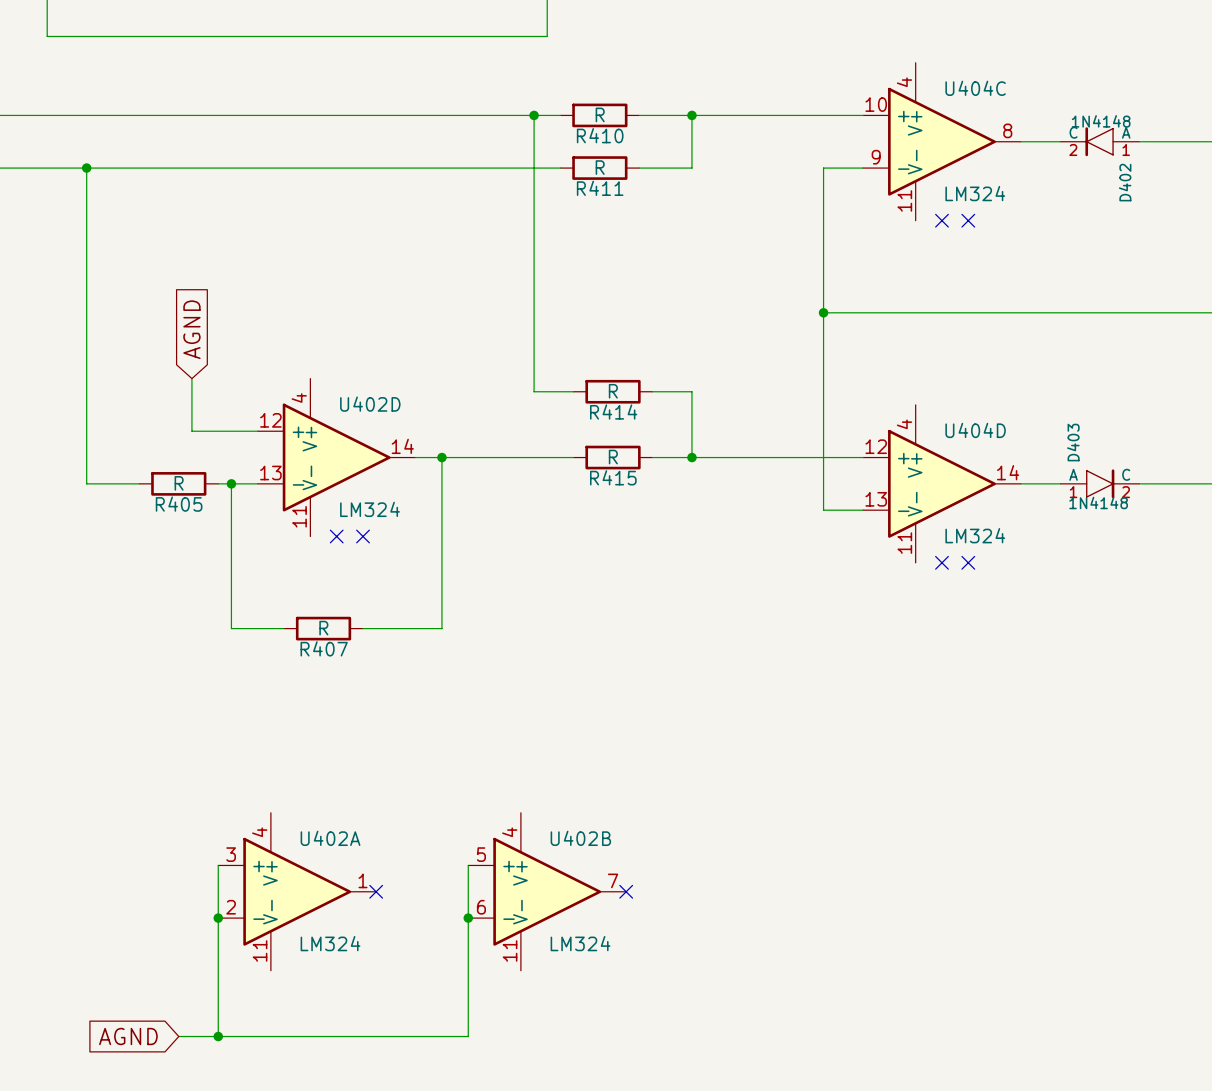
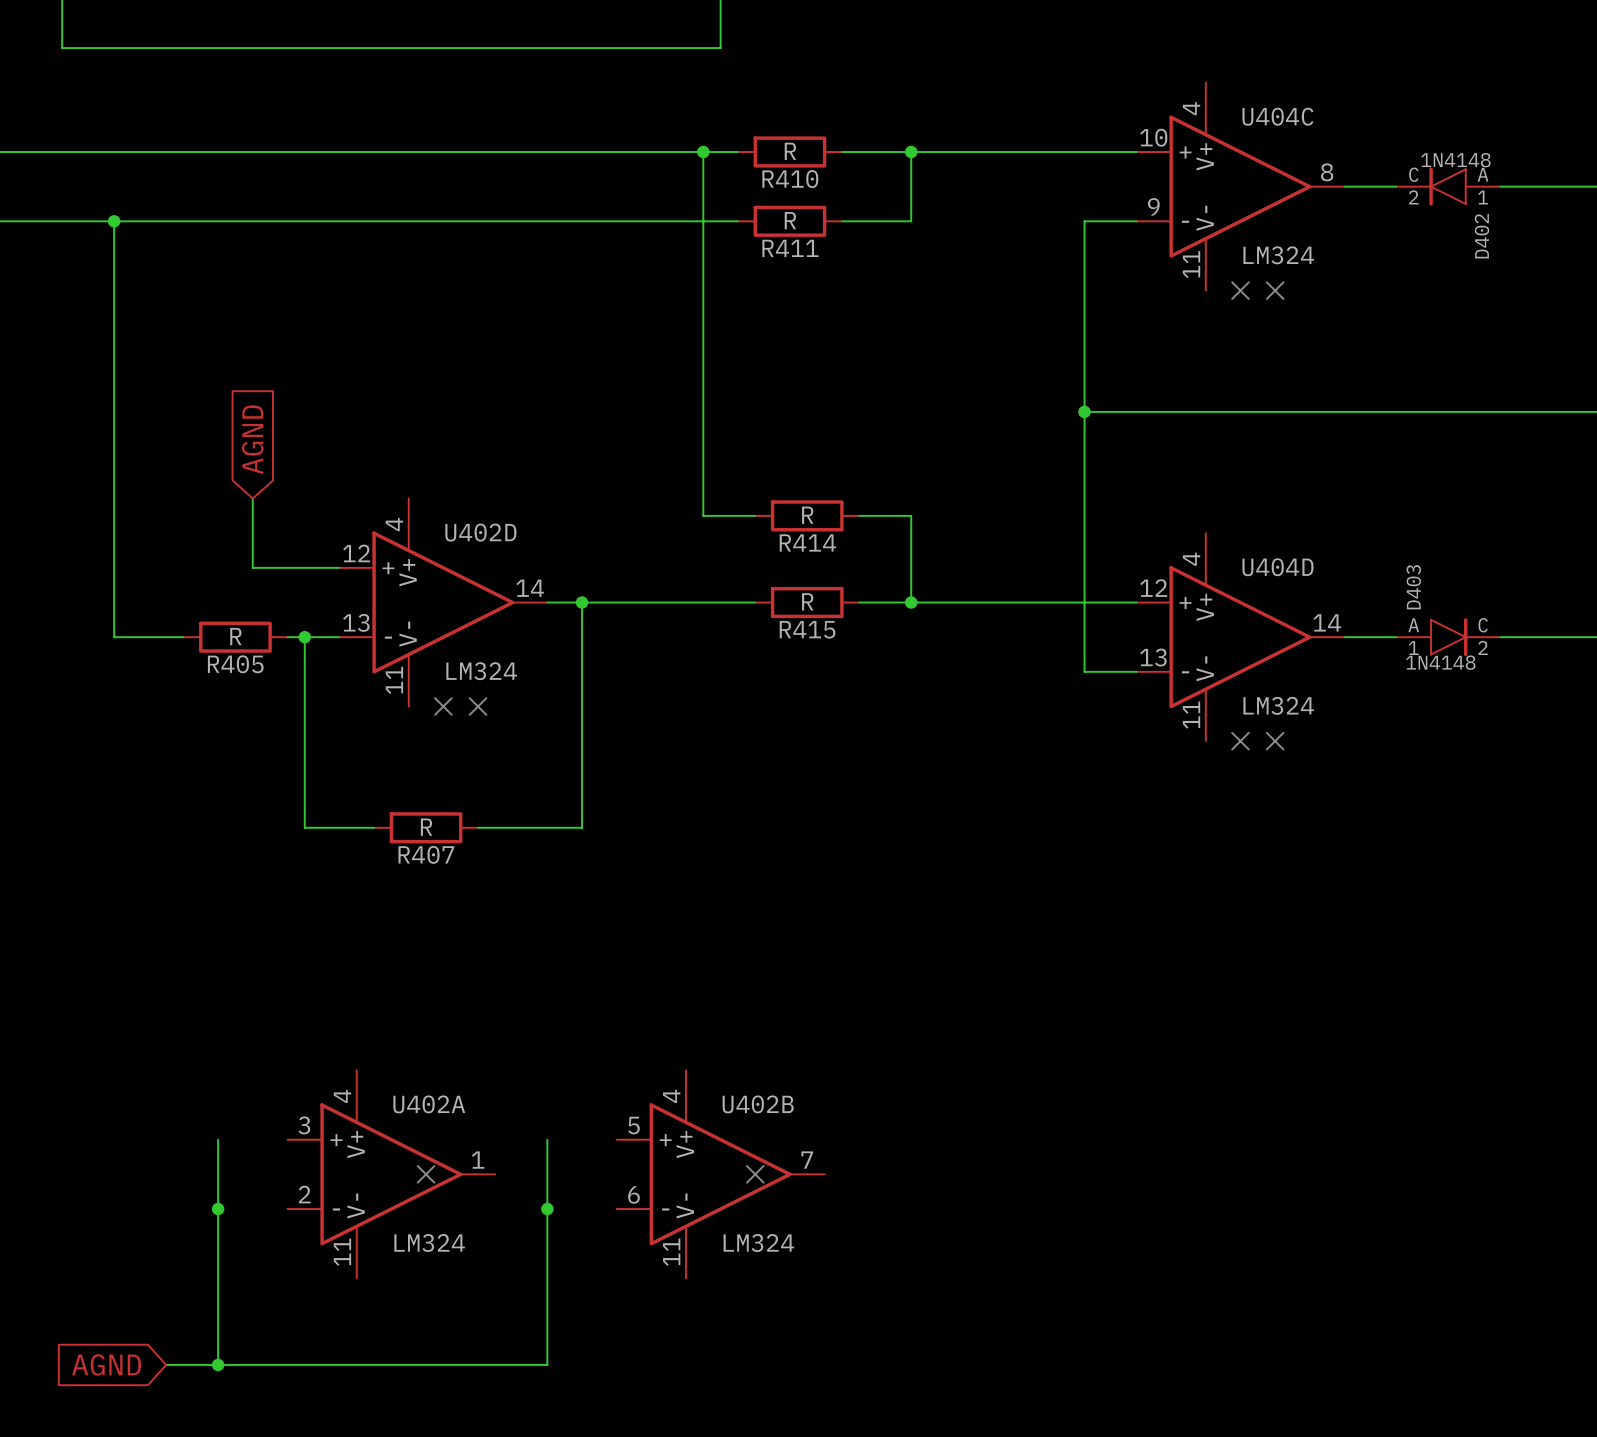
wire: (218, 865) (218, 1036) -> (218, 1139) (218, 1364)
wire: (468, 865) (468, 1036) (415, 1036) -> (547, 1139) (547, 1364)
no-connect mark position: (376, 891) -> (426, 1174)
no-connect mark position: (626, 891) -> (755, 1174)
junction position: (218, 918) -> (218, 1209)
junction position: (468, 918) -> (547, 1209)
wire: none -> (166, 1364) (235, 1364)
global label position: AGND (128, 1036) -> AGND (106, 1364)
junction position: (218, 1036) -> (218, 1364)

